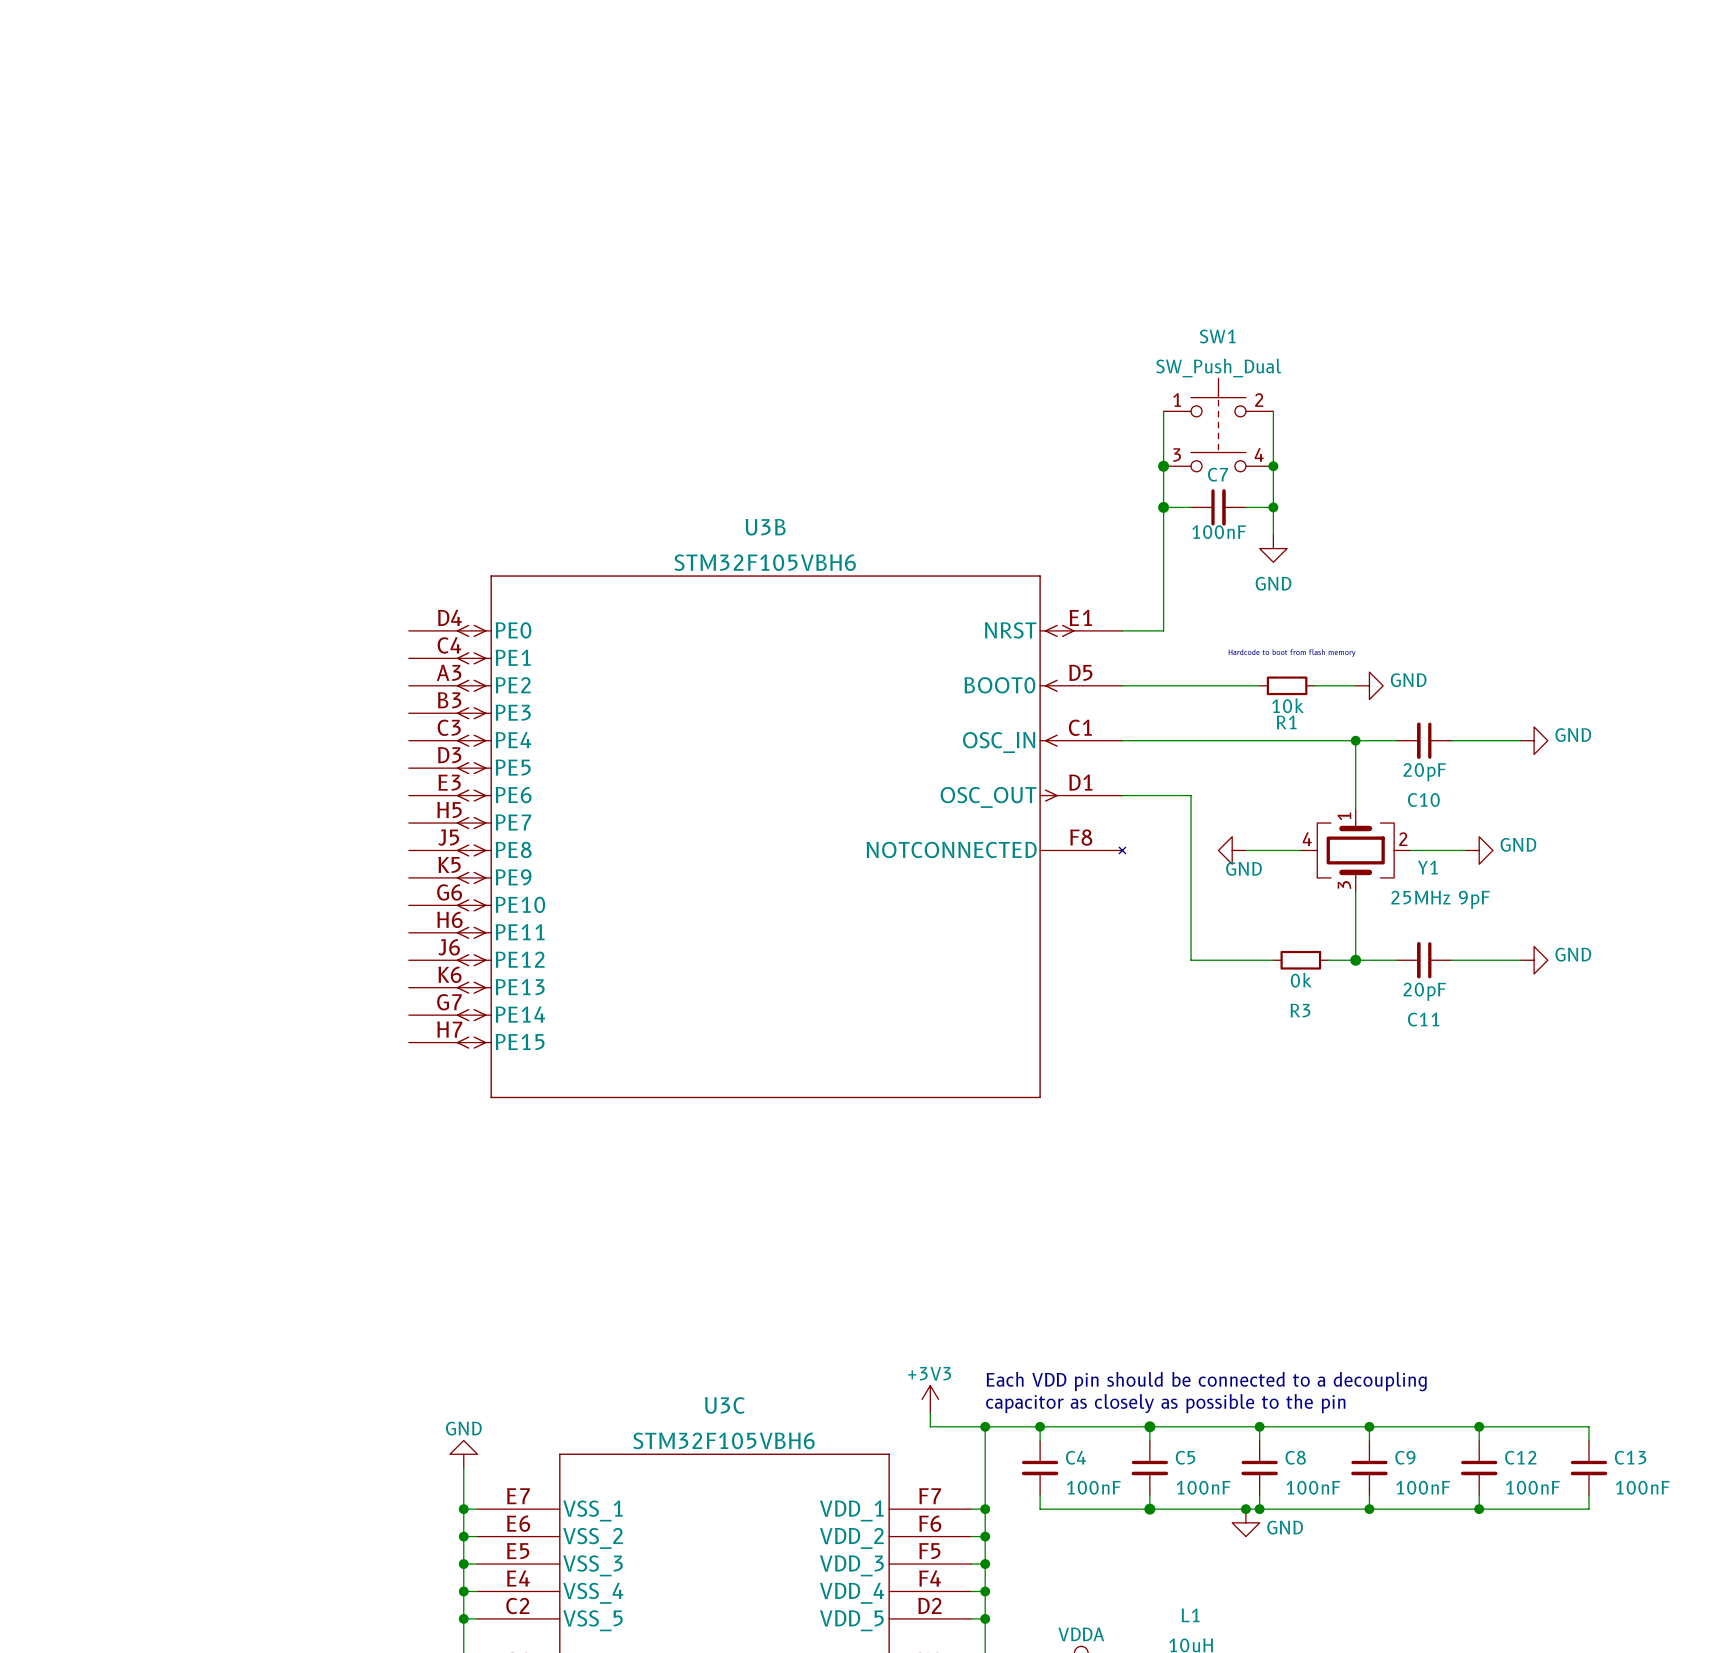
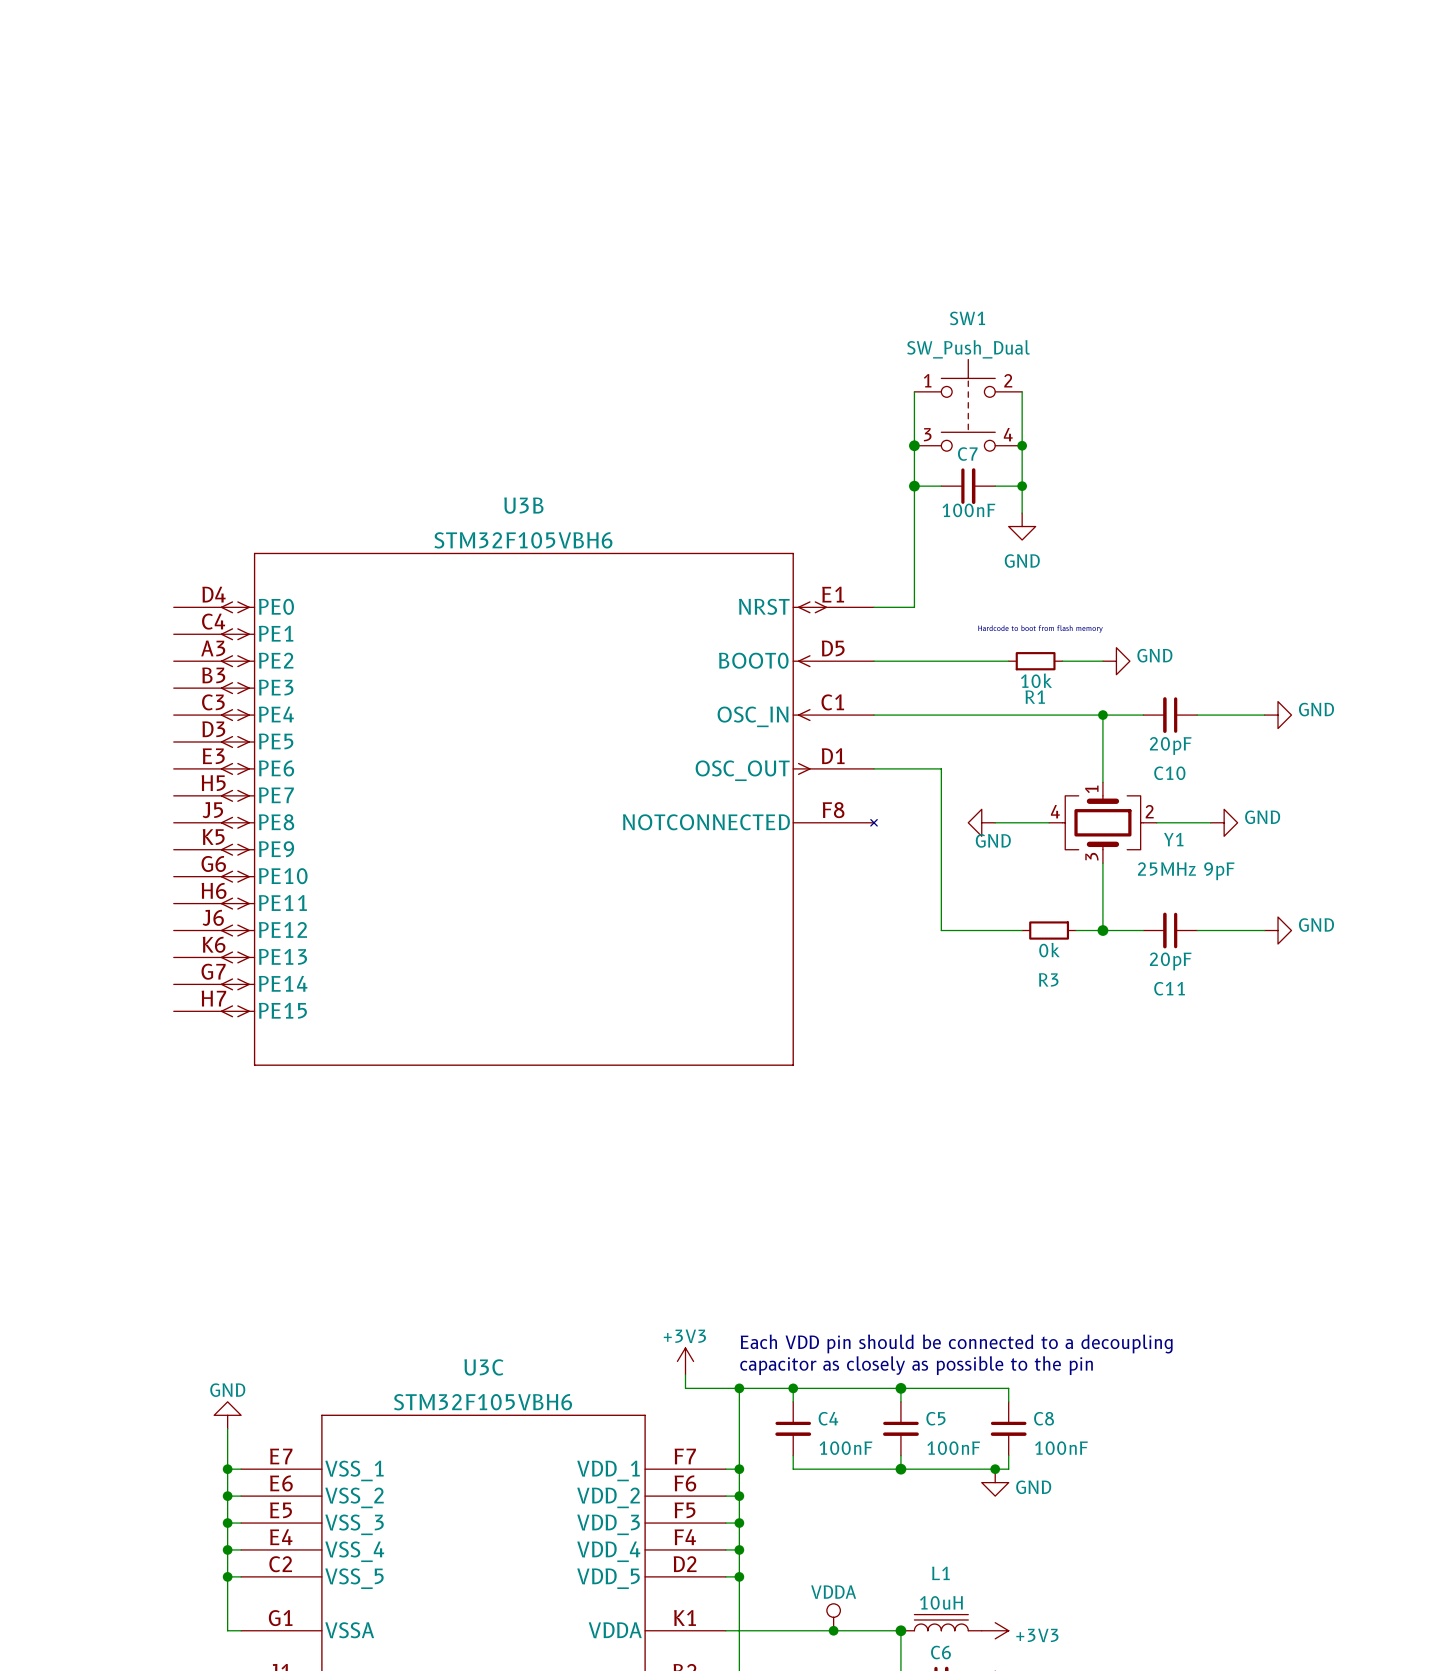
wire: (1259, 1426) (1588, 1426) (1588, 1440) -> none
junction: (1259, 1426) -> none
wire: (1369, 1426) (1369, 1440) -> none
junction: (1369, 1426) -> none
wire: (1479, 1426) (1479, 1440) -> none
junction: (1479, 1426) -> none
C9: 100nF (1369, 1467) -> none
C12: 100nF (1479, 1467) -> none
C13: 100nF (1588, 1467) -> none
wire: (1369, 1495) (1369, 1509) -> none
wire: (1479, 1495) (1479, 1509) -> none
wire: (1588, 1495) (1588, 1509) (1259, 1509) -> none
junction: (1259, 1509) -> none
junction: (1369, 1509) -> none
junction: (1479, 1509) -> none

